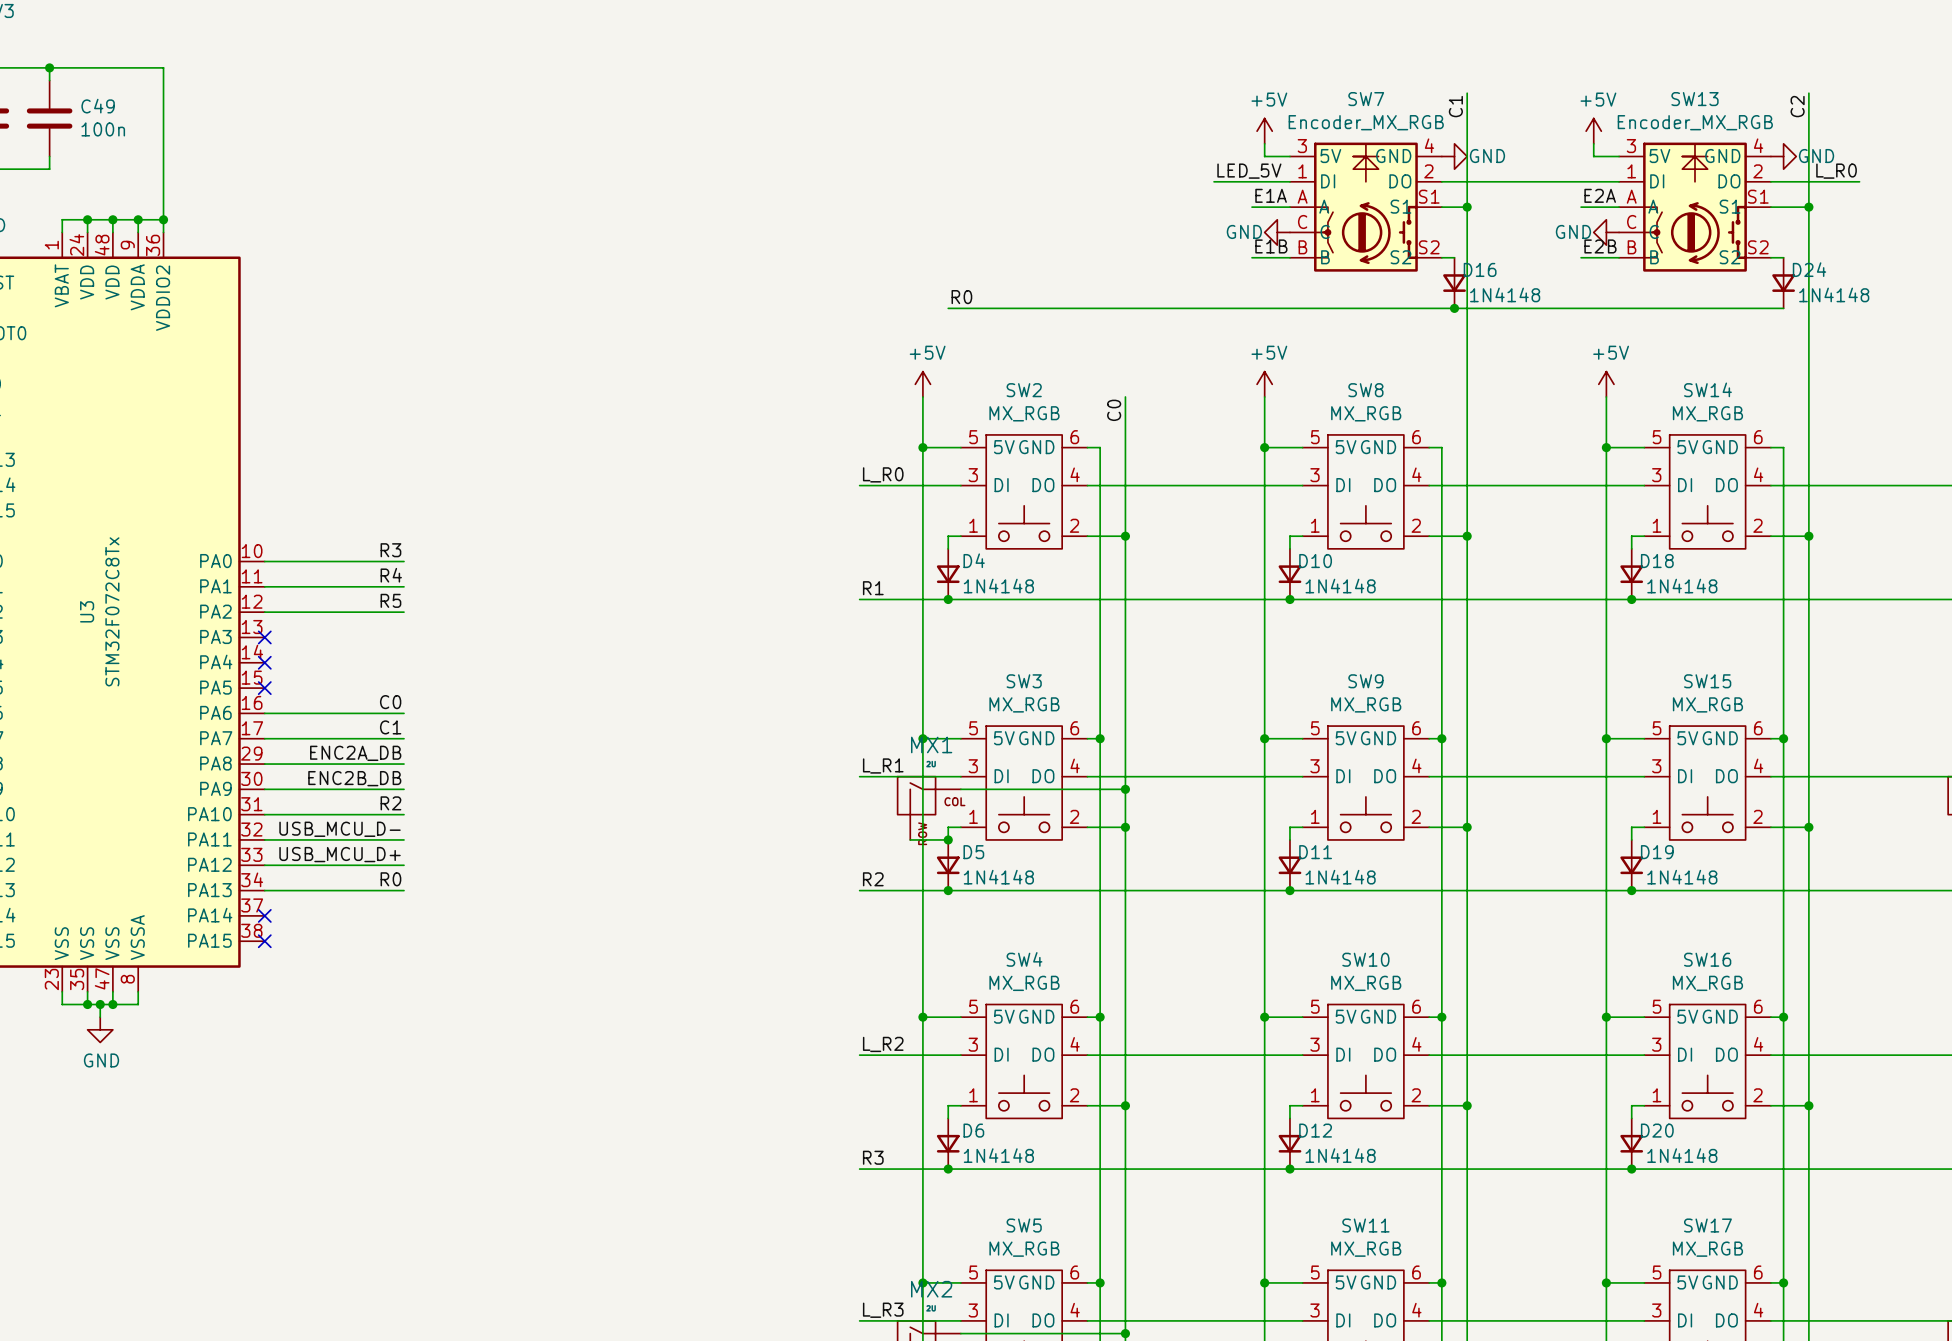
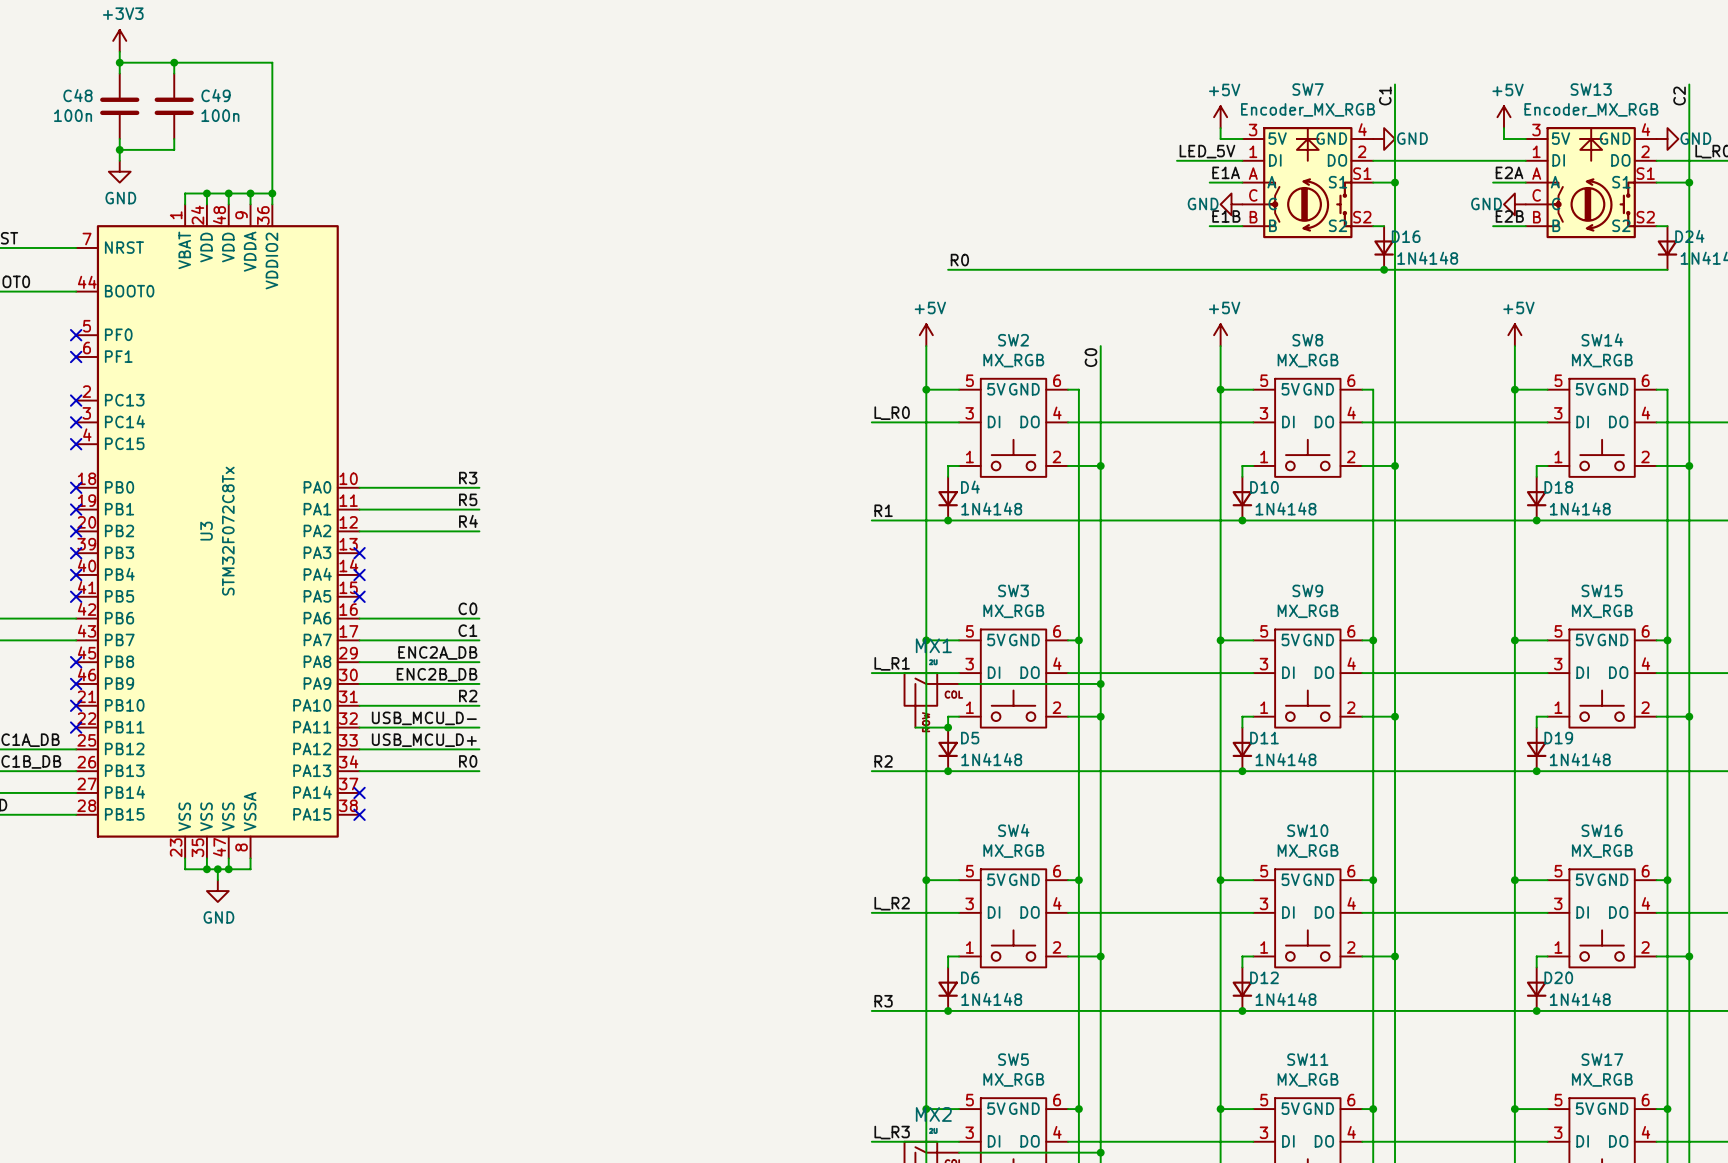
label: R4 (391, 575) -> R5 (468, 499)
label: R5 (390, 600) -> R4 (468, 521)

